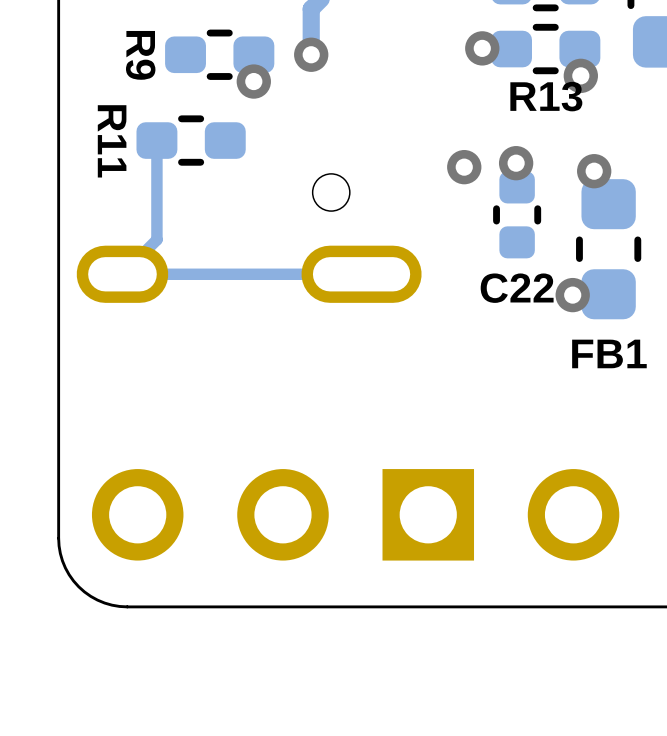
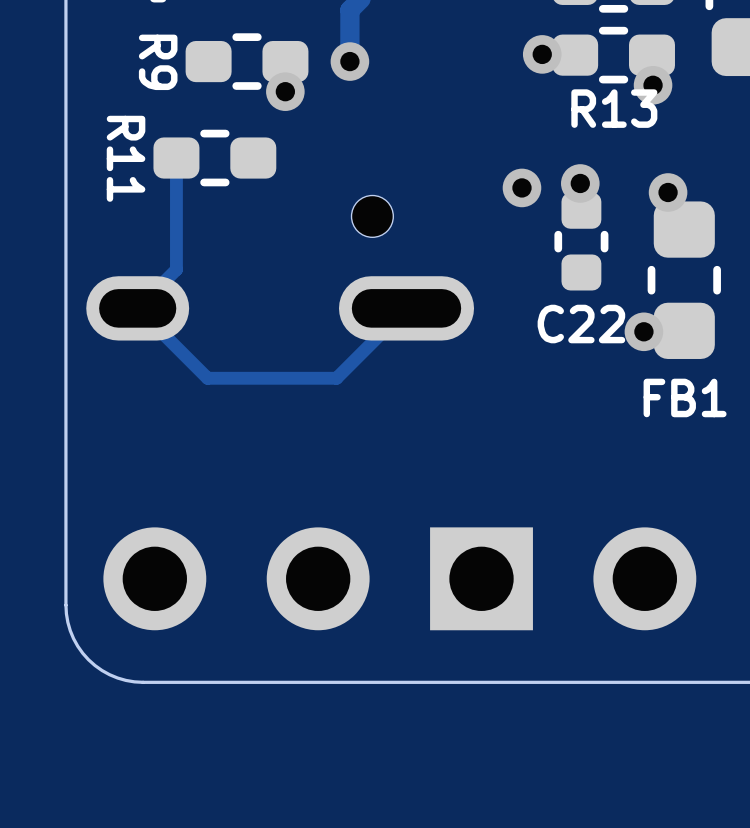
track: (361, 274) (122, 274) -> (406, 308) (336, 378) (207, 378) (137, 308)

